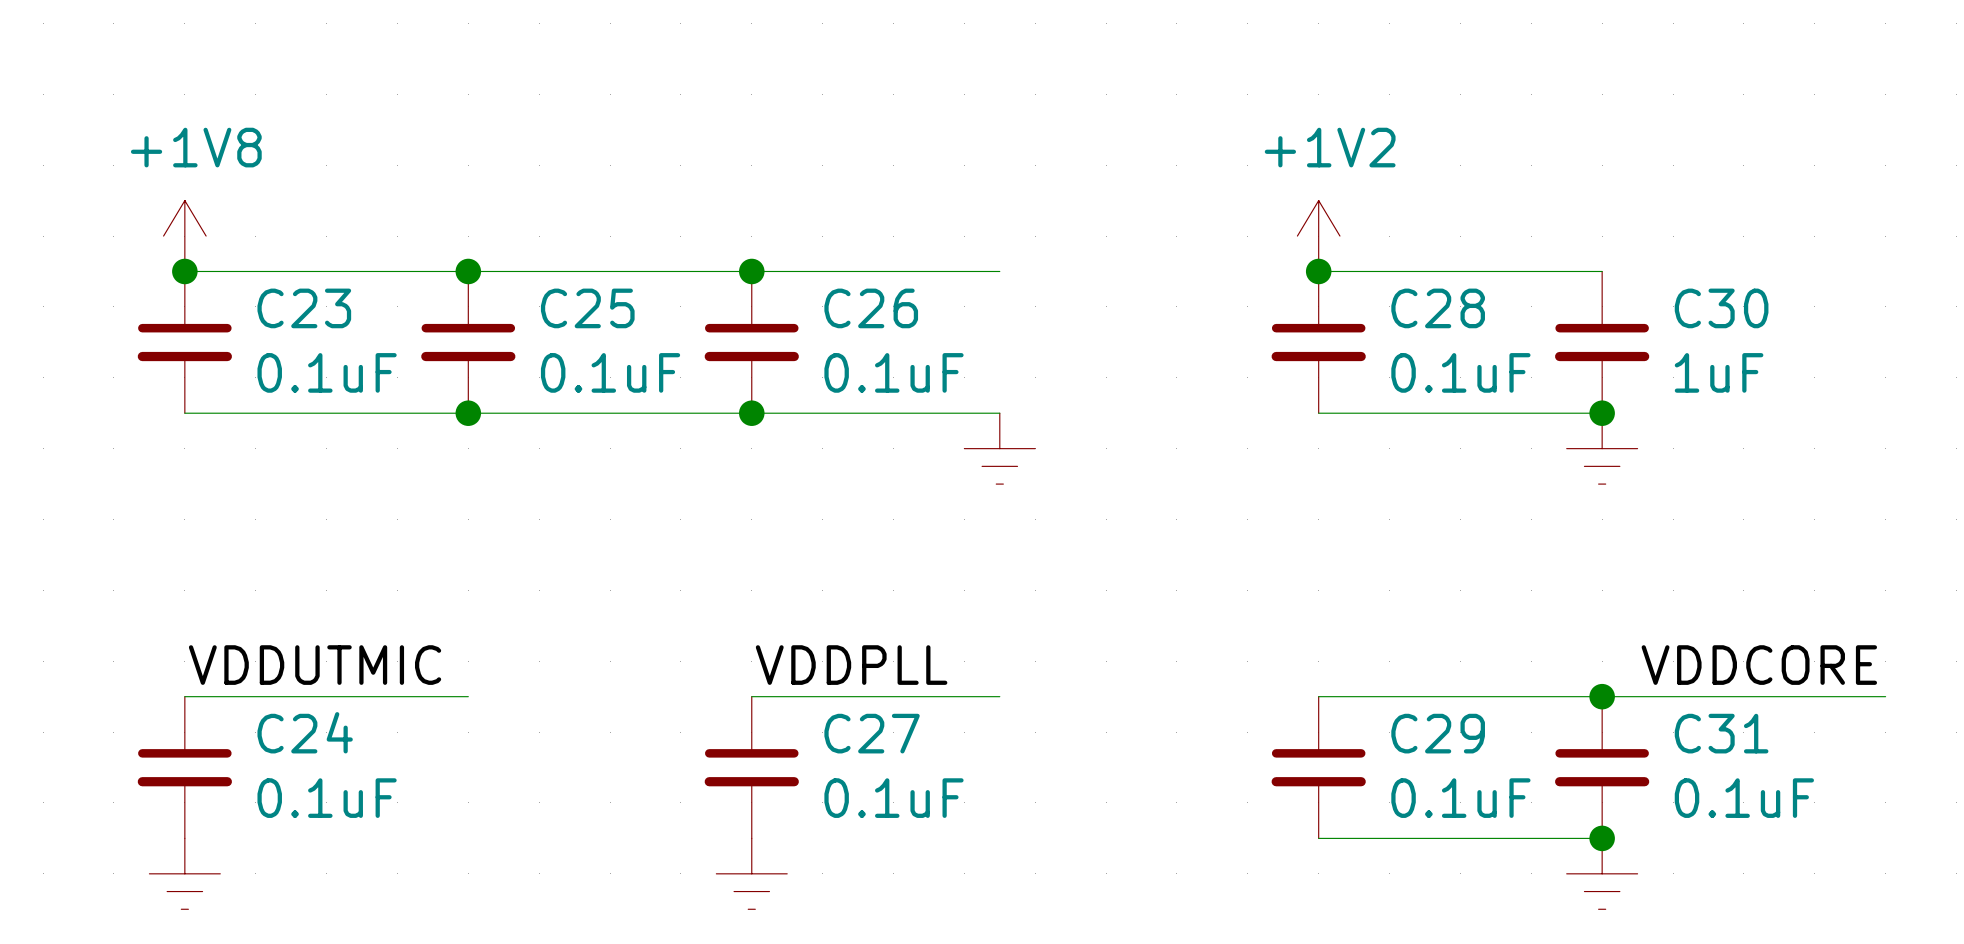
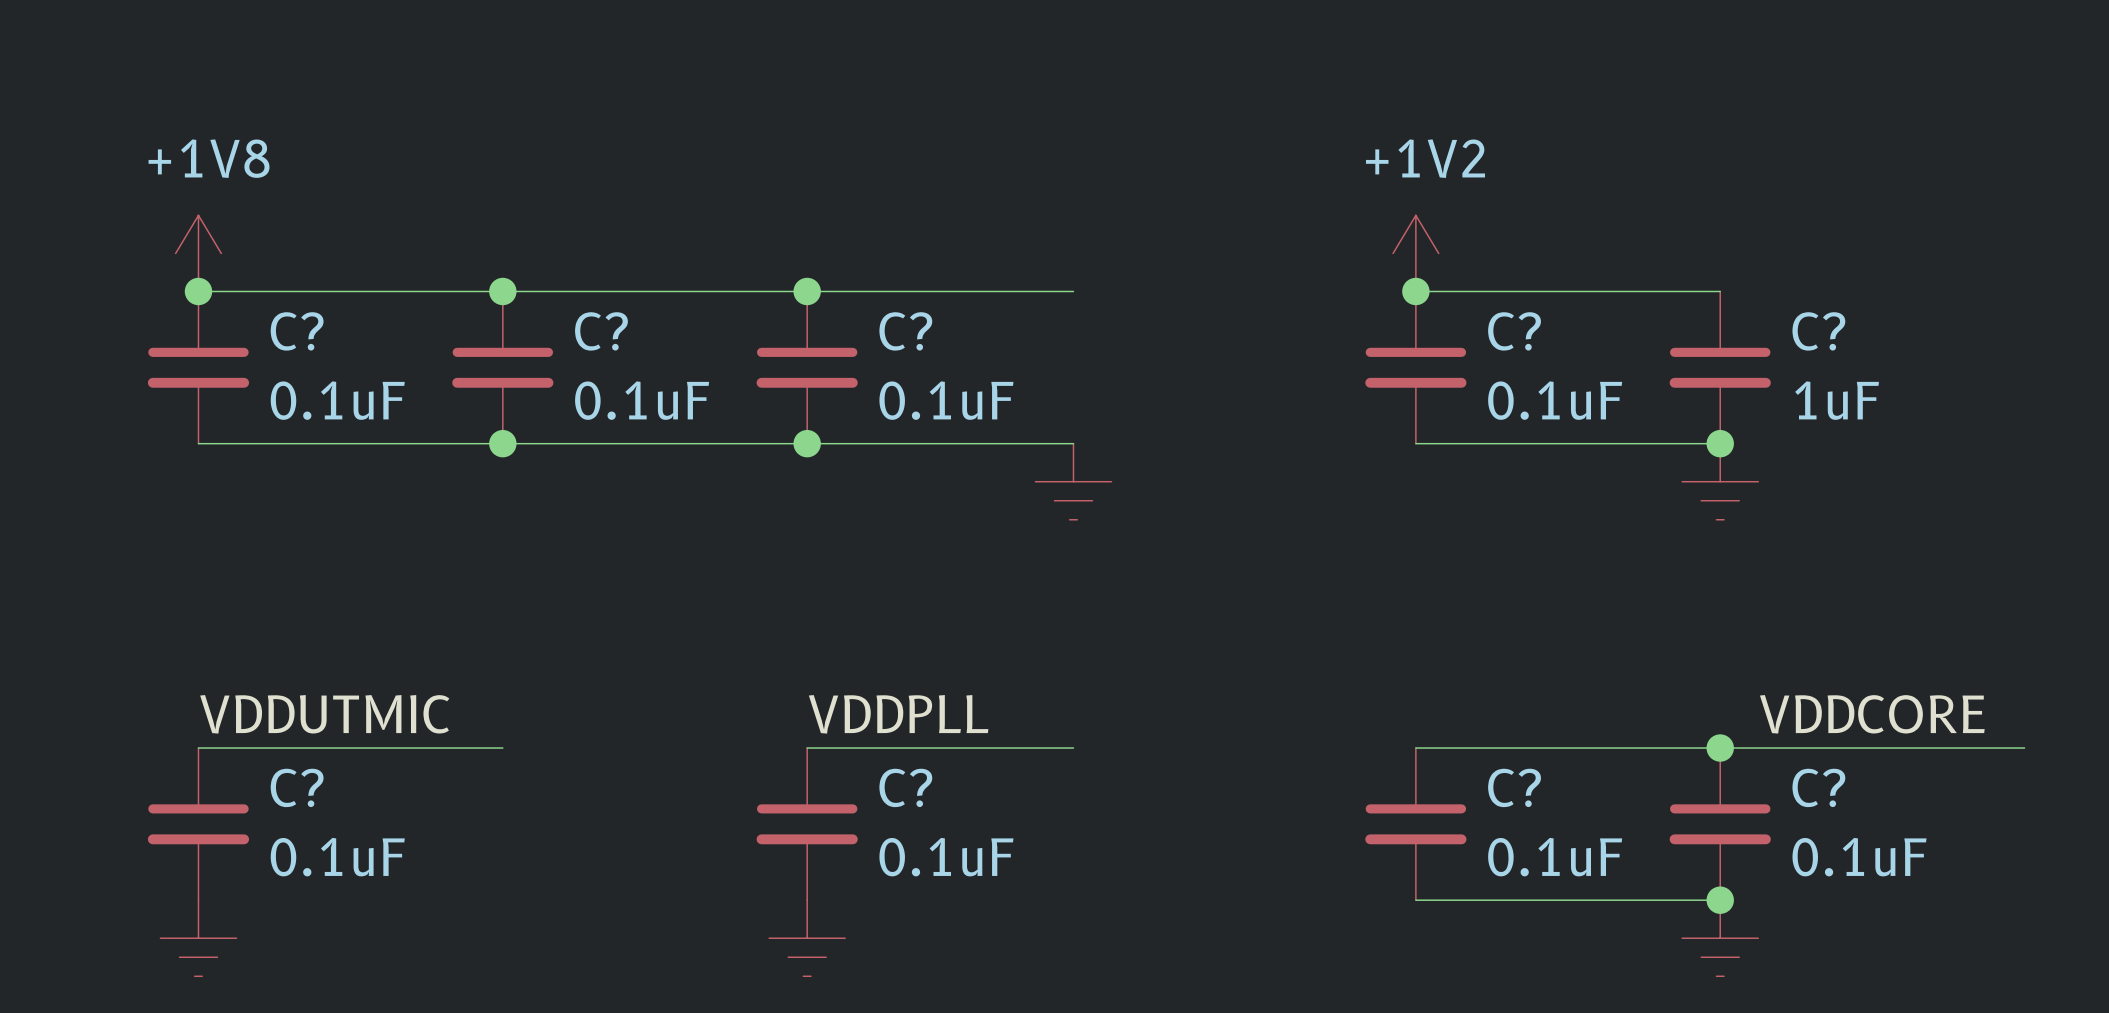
C23 name: C23 (304, 308) -> C? (297, 331)
C25 name: C25 (587, 308) -> C? (601, 331)
C26 name: C26 (871, 308) -> C? (905, 331)
C28 name: C28 (1438, 308) -> C? (1514, 331)
C30 name: C30 (1721, 308) -> C? (1818, 331)
C24 name: C24 (305, 732) -> C? (297, 787)
C27 name: C27 (872, 733) -> C? (905, 787)
C29 name: C29 (1438, 733) -> C? (1514, 787)
C31 name: C31 (1721, 733) -> C? (1818, 787)

